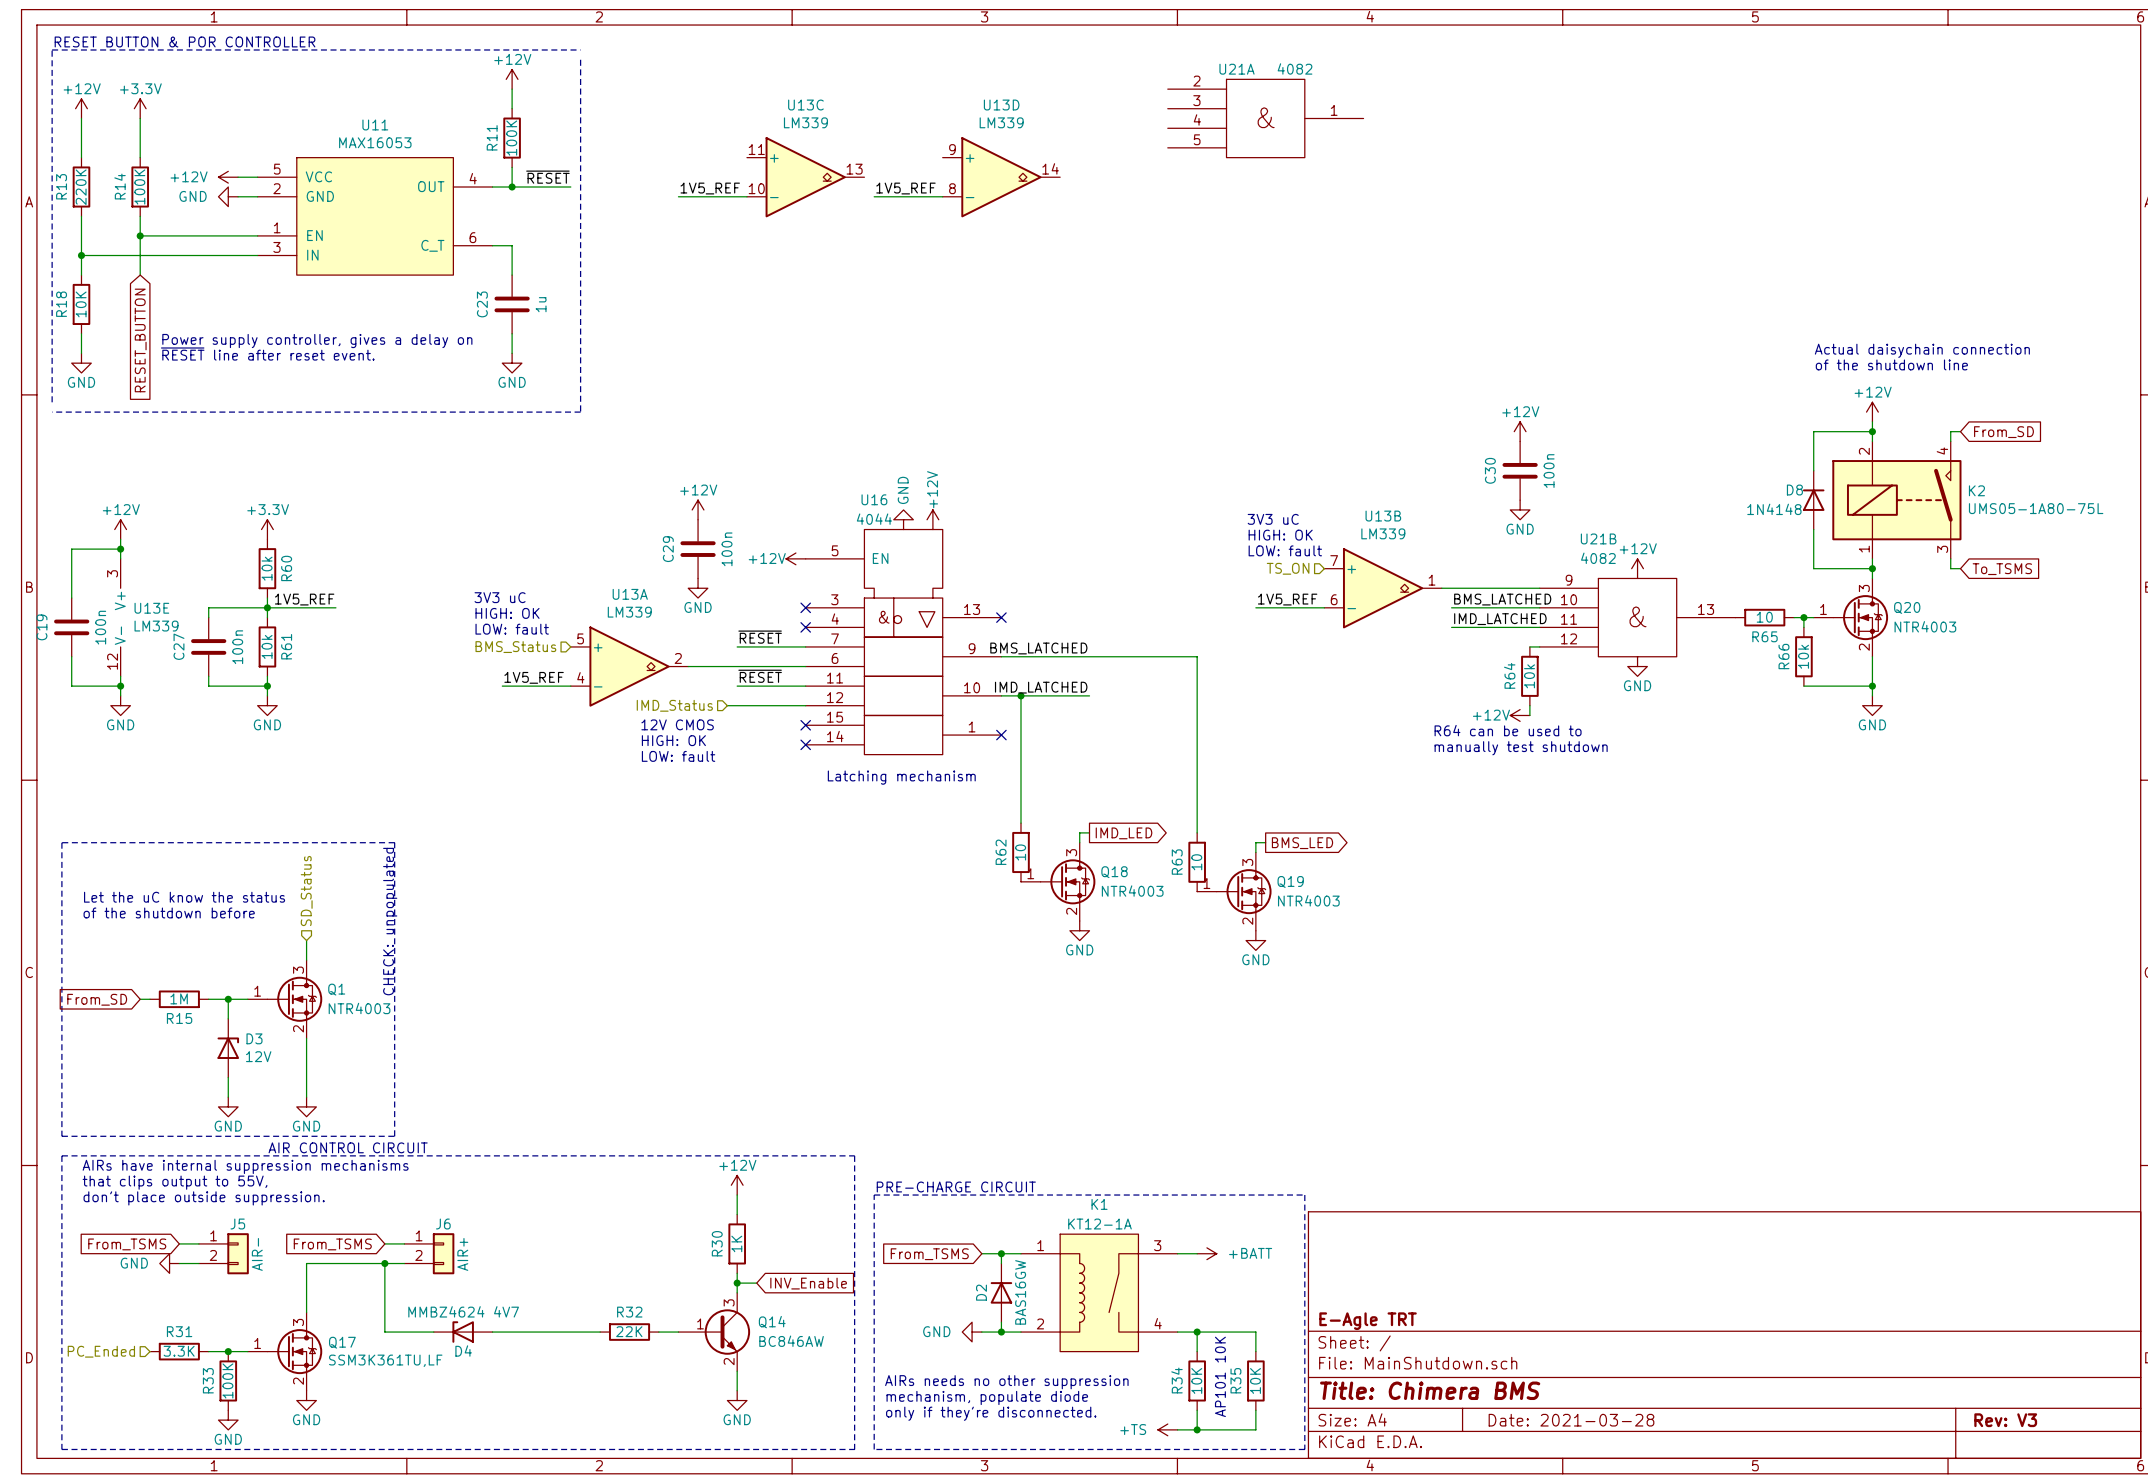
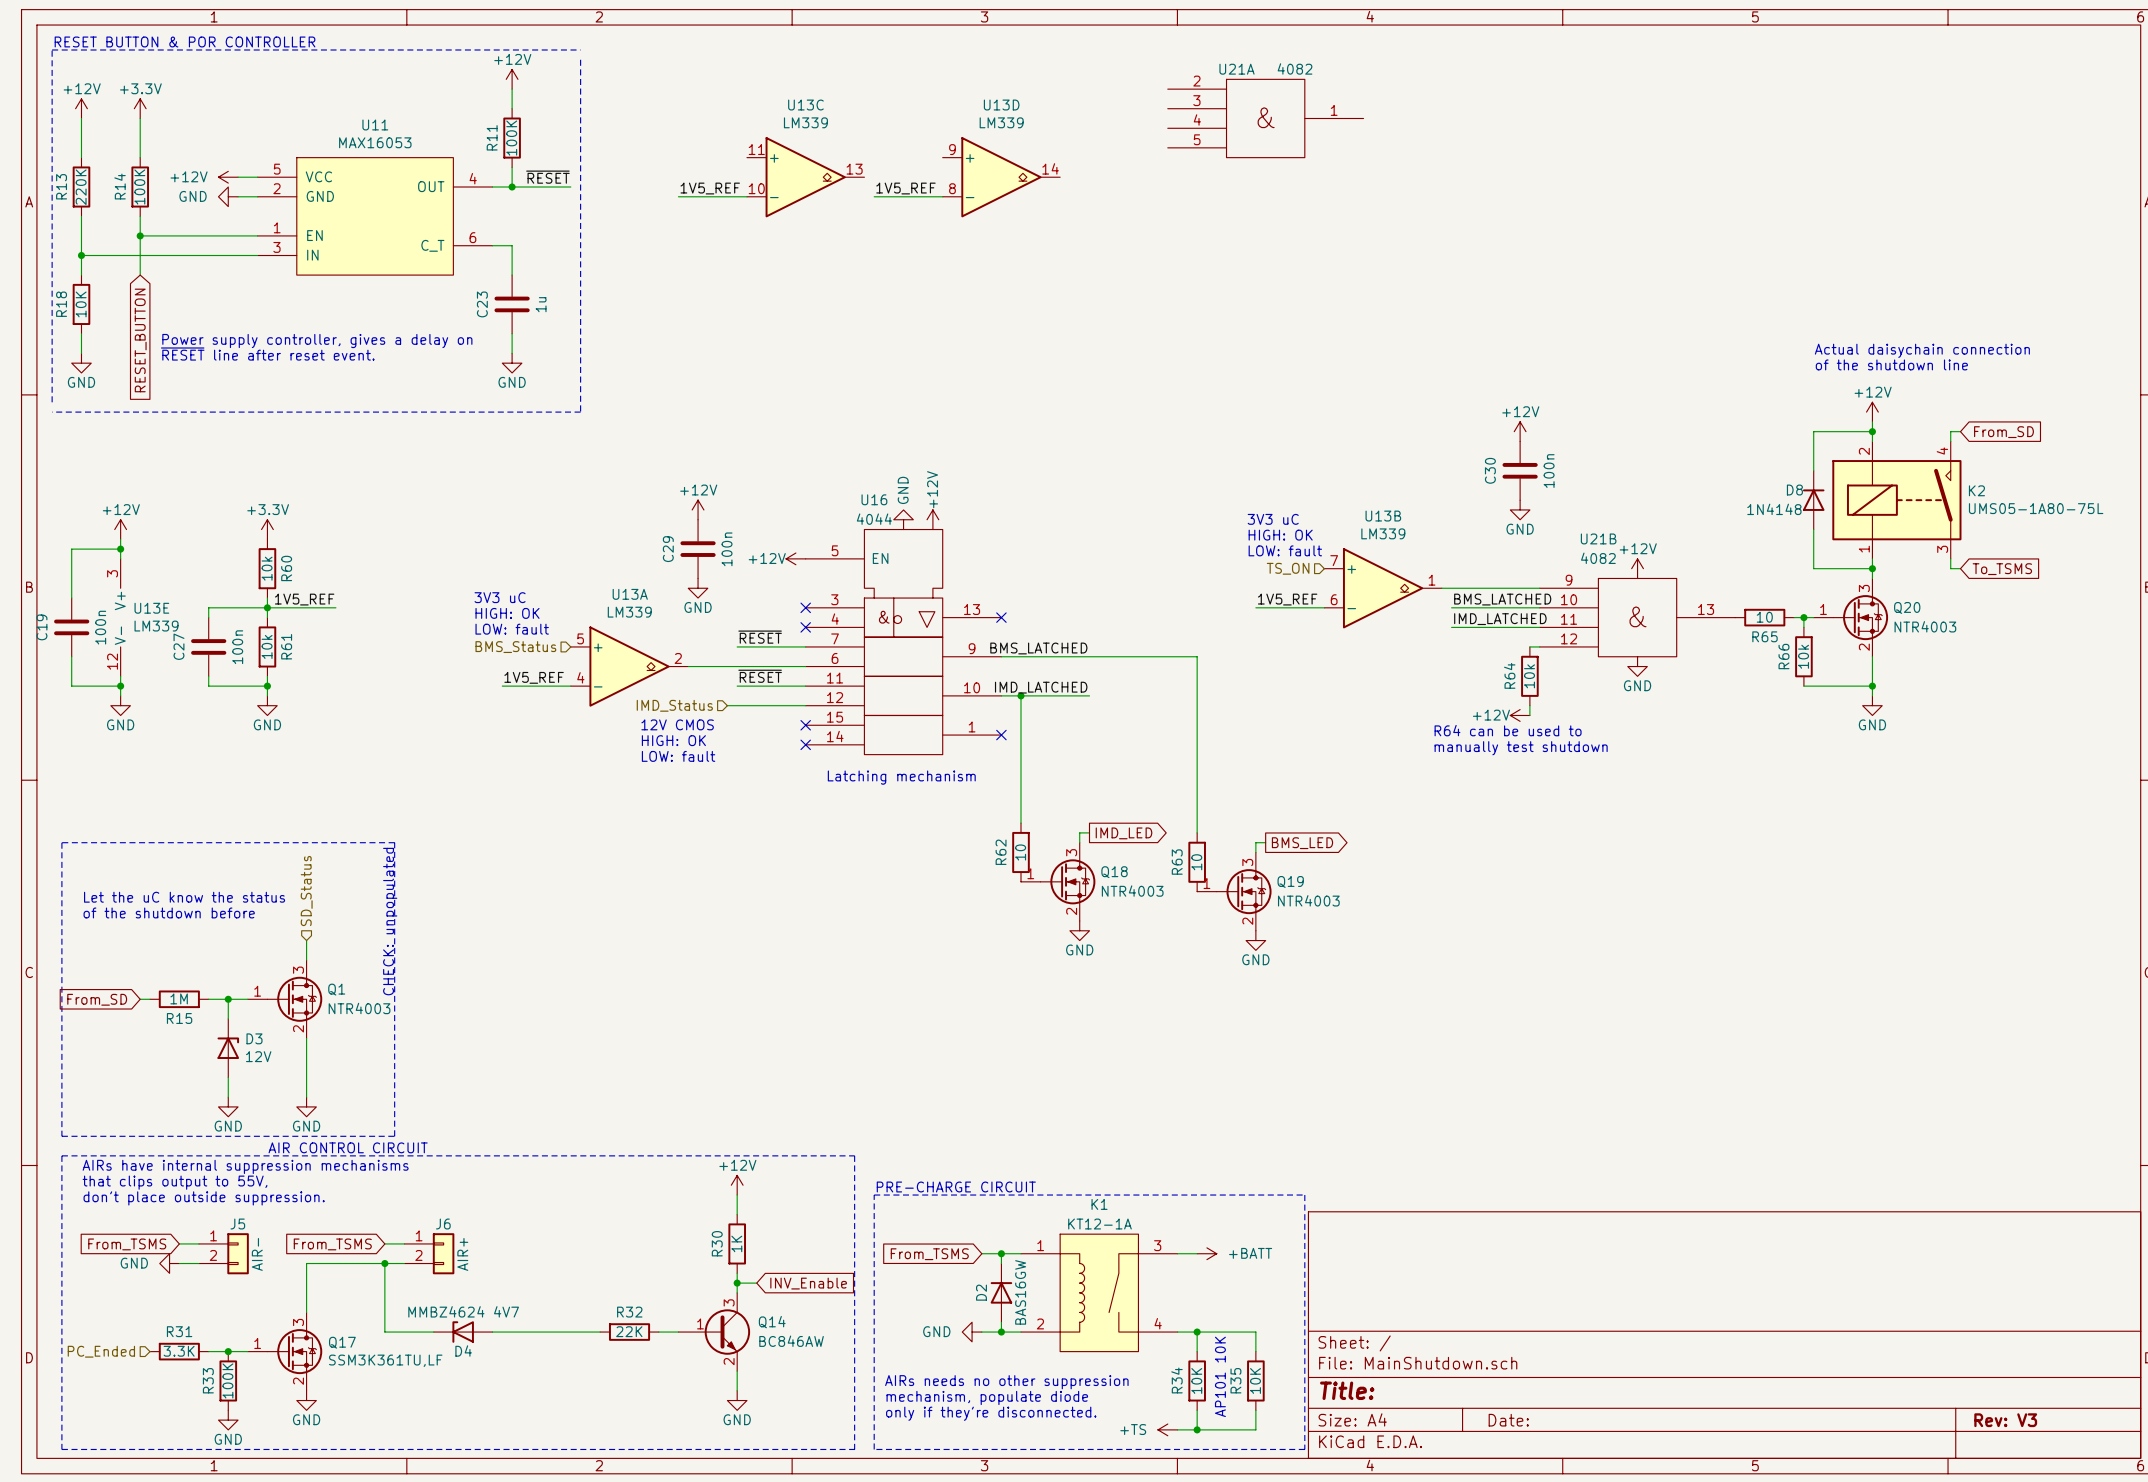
title block: E-Agle TRT (1368, 1321) -> none
title block: Title: Chimera BMS (1430, 1390) -> Title: (1347, 1390)
title block: Date: 2021-03-28 (1571, 1420) -> Date: (1508, 1420)

